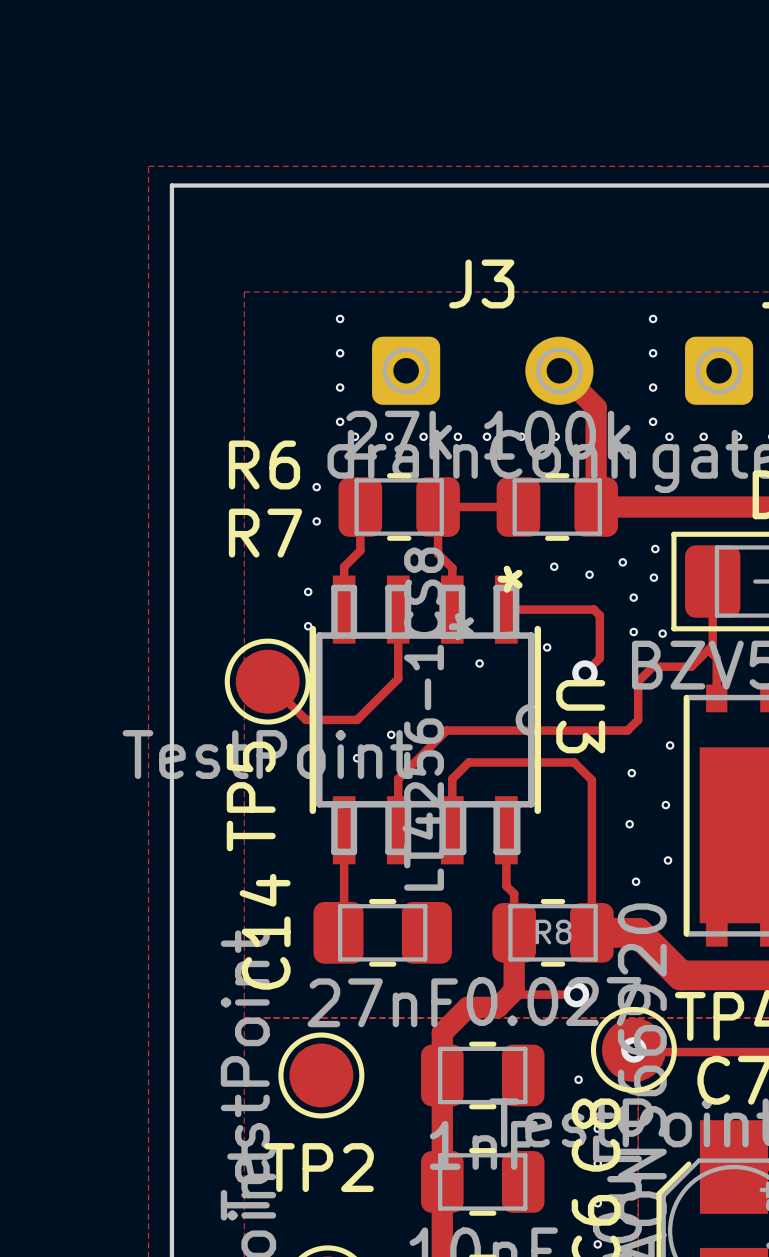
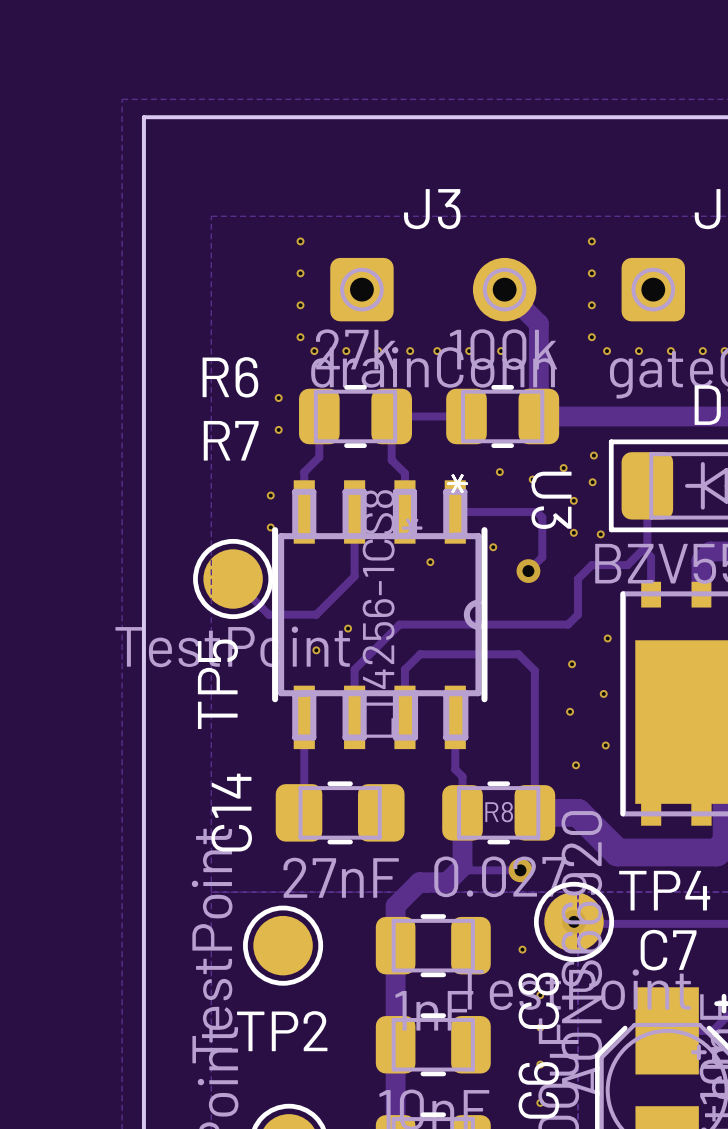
U3 name position: U3 (580, 716) -> U3 (551, 500)

